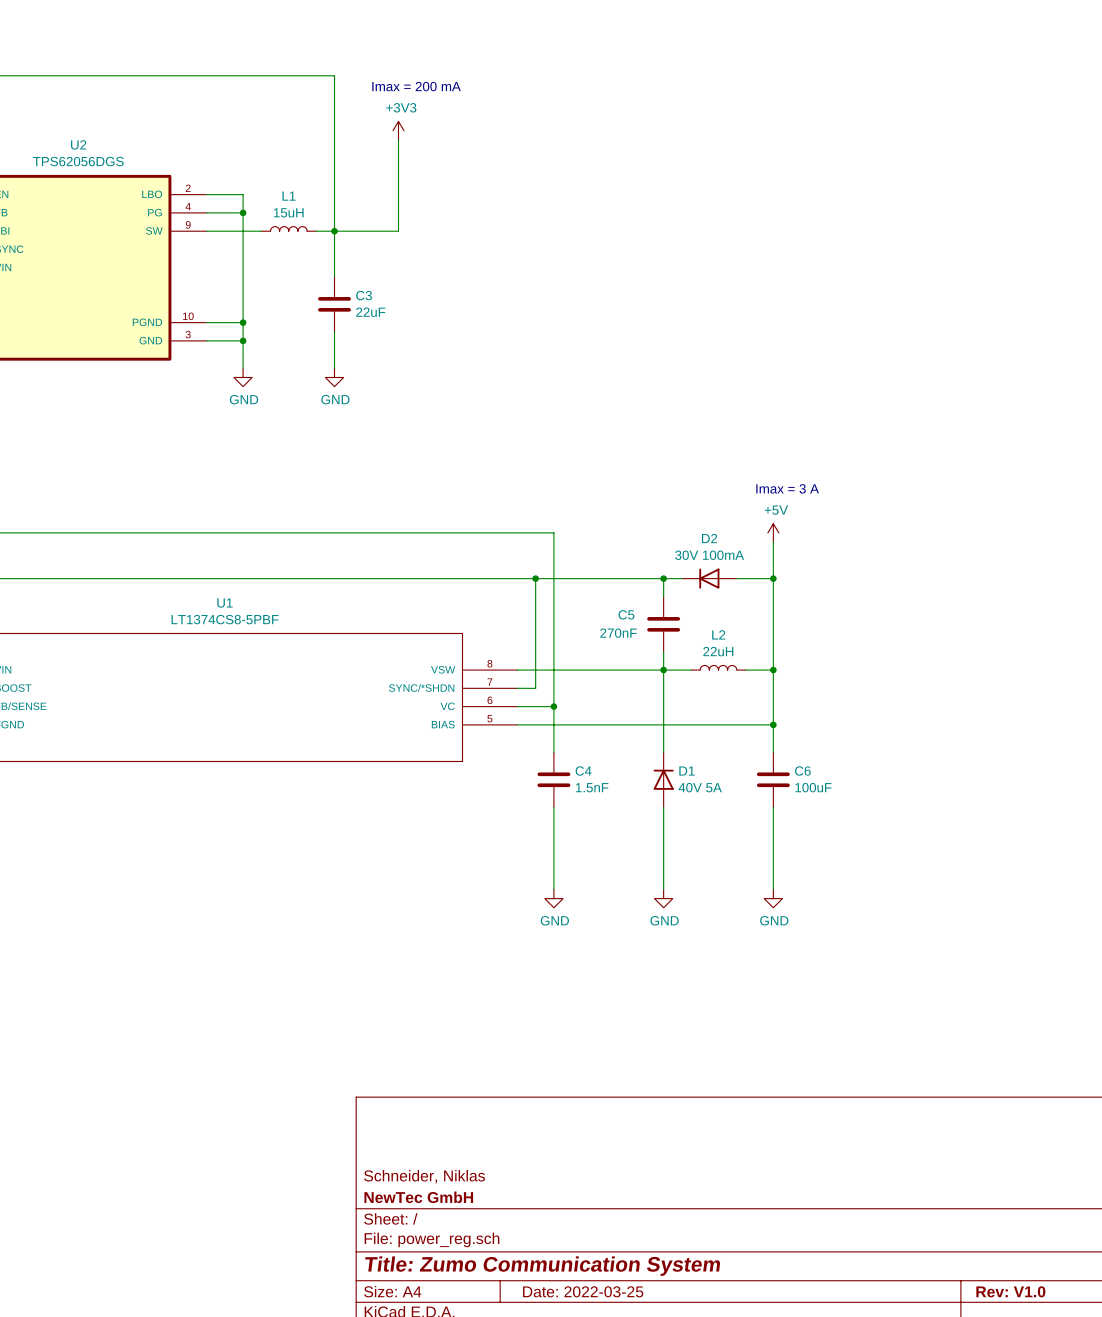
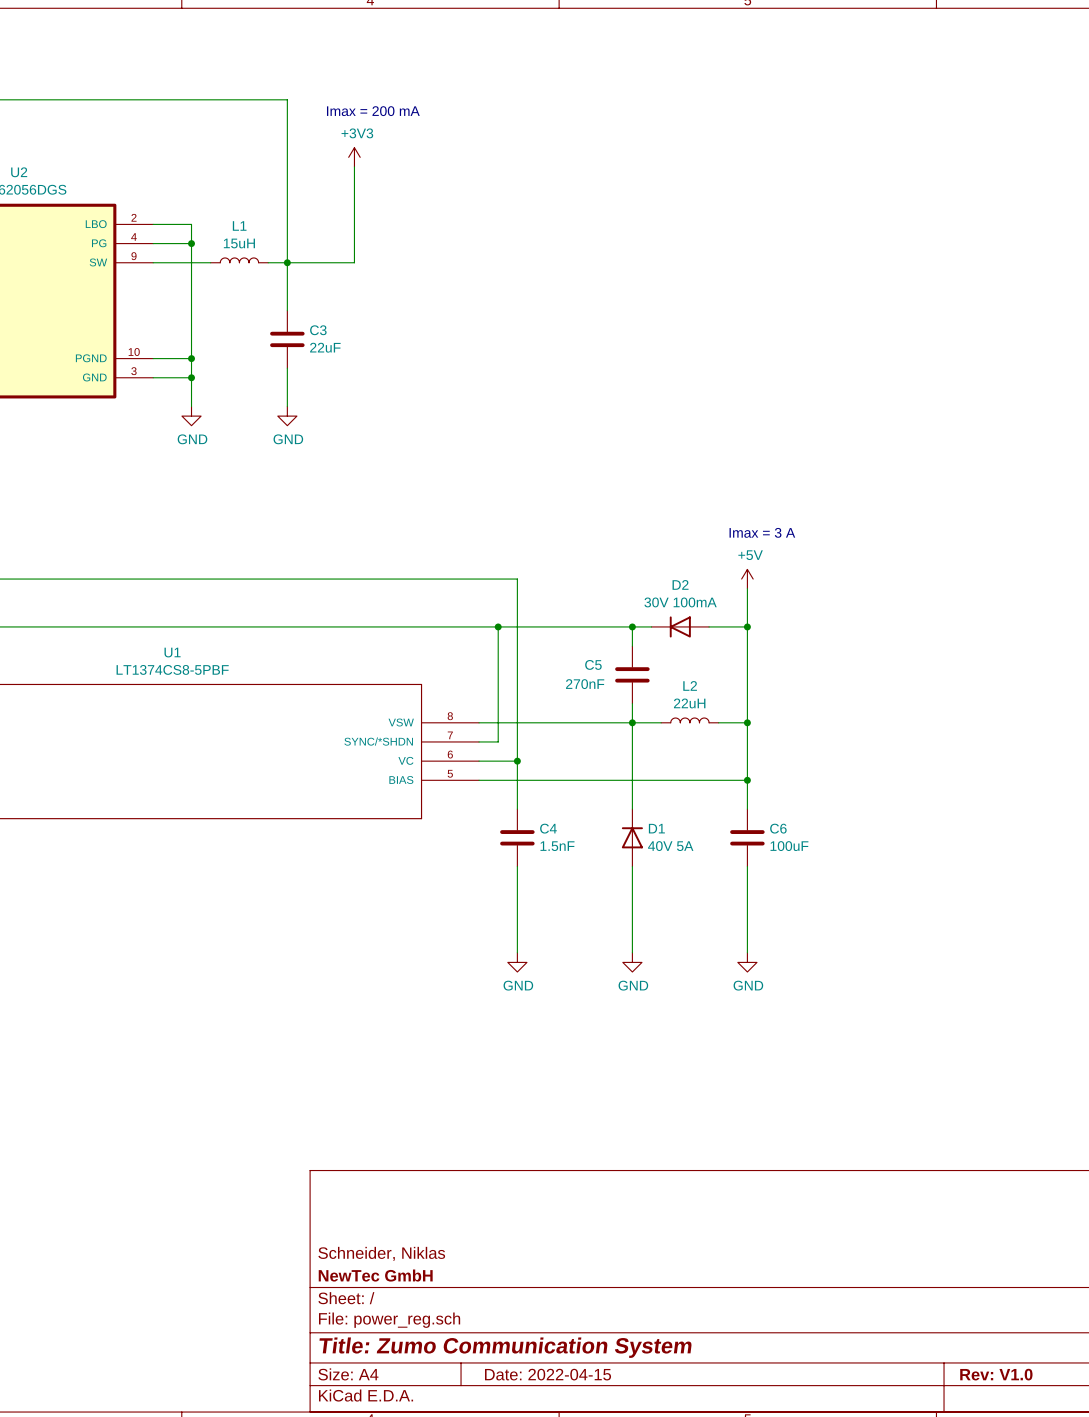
title block: Date: 2022-03-25 (583, 1291) -> Date: 2022-04-15 (548, 1374)

